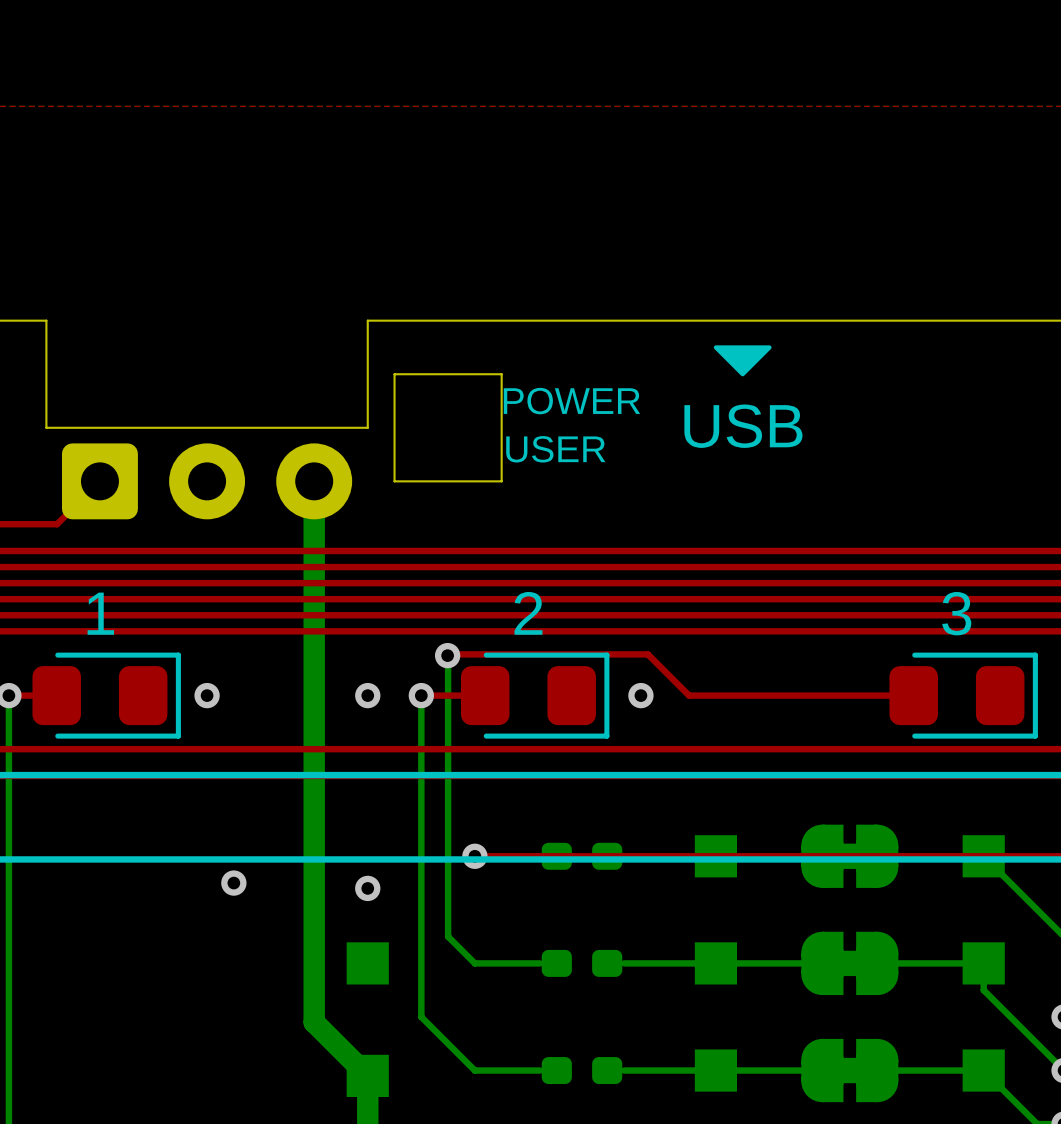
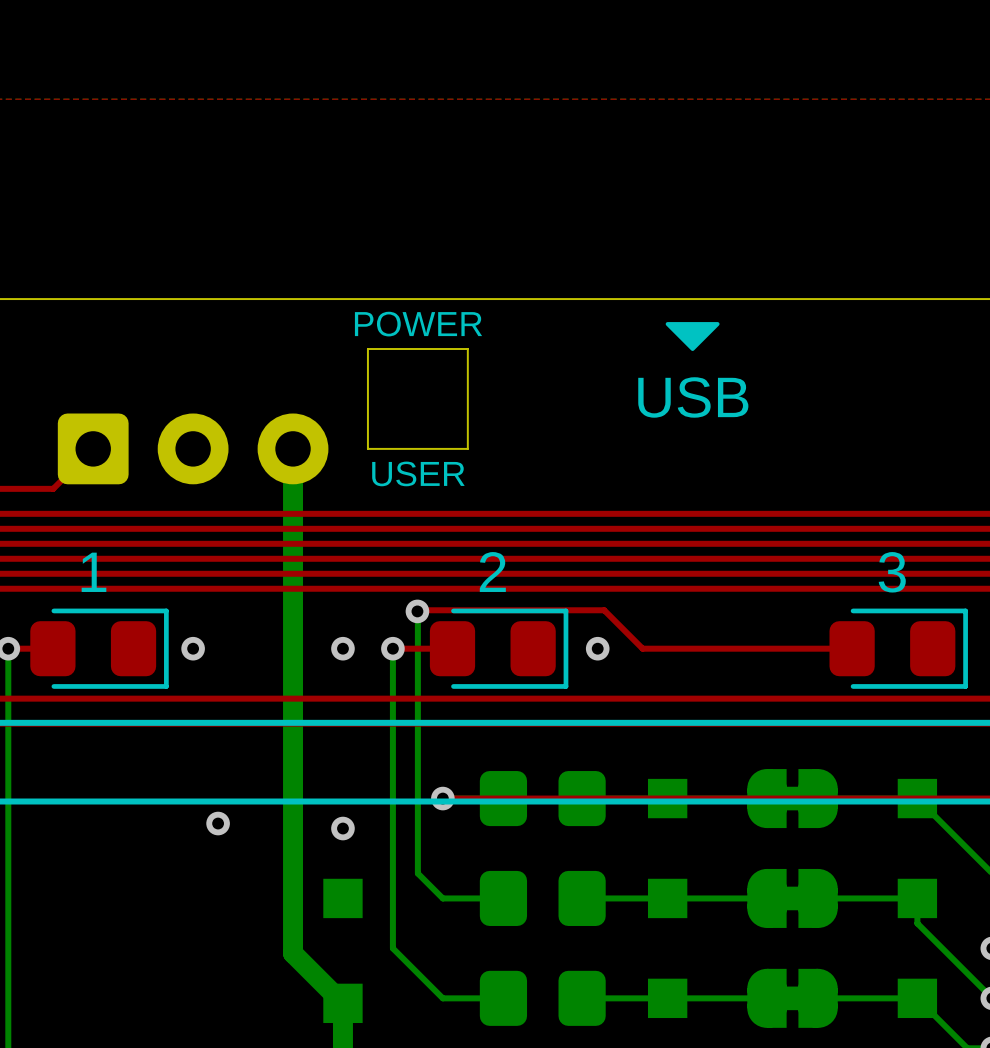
board edge: (46, 320) (46, 427) (367, 427) (367, 320) -> (43, 299) (342, 299)
text position: POWER (571, 401) -> POWER (418, 324)
text position: USER (555, 449) -> USER (418, 473)
part footprint: [541, 842, 623, 870] -> [479, 771, 606, 827]
part footprint: [541, 949, 623, 977] -> [479, 870, 606, 926]
part footprint: [541, 1057, 623, 1085] -> [479, 970, 606, 1026]

